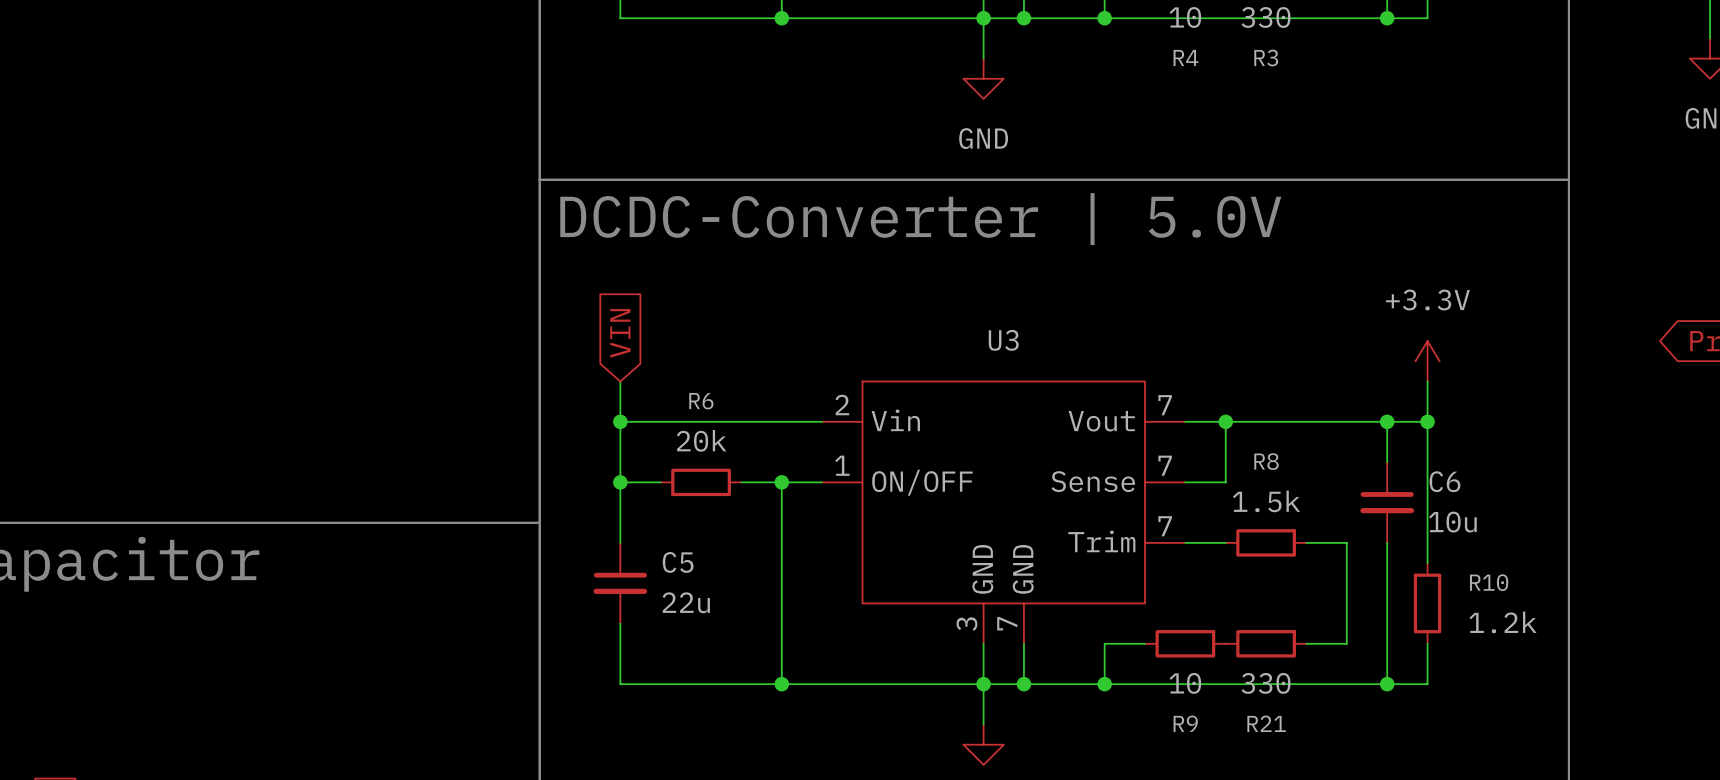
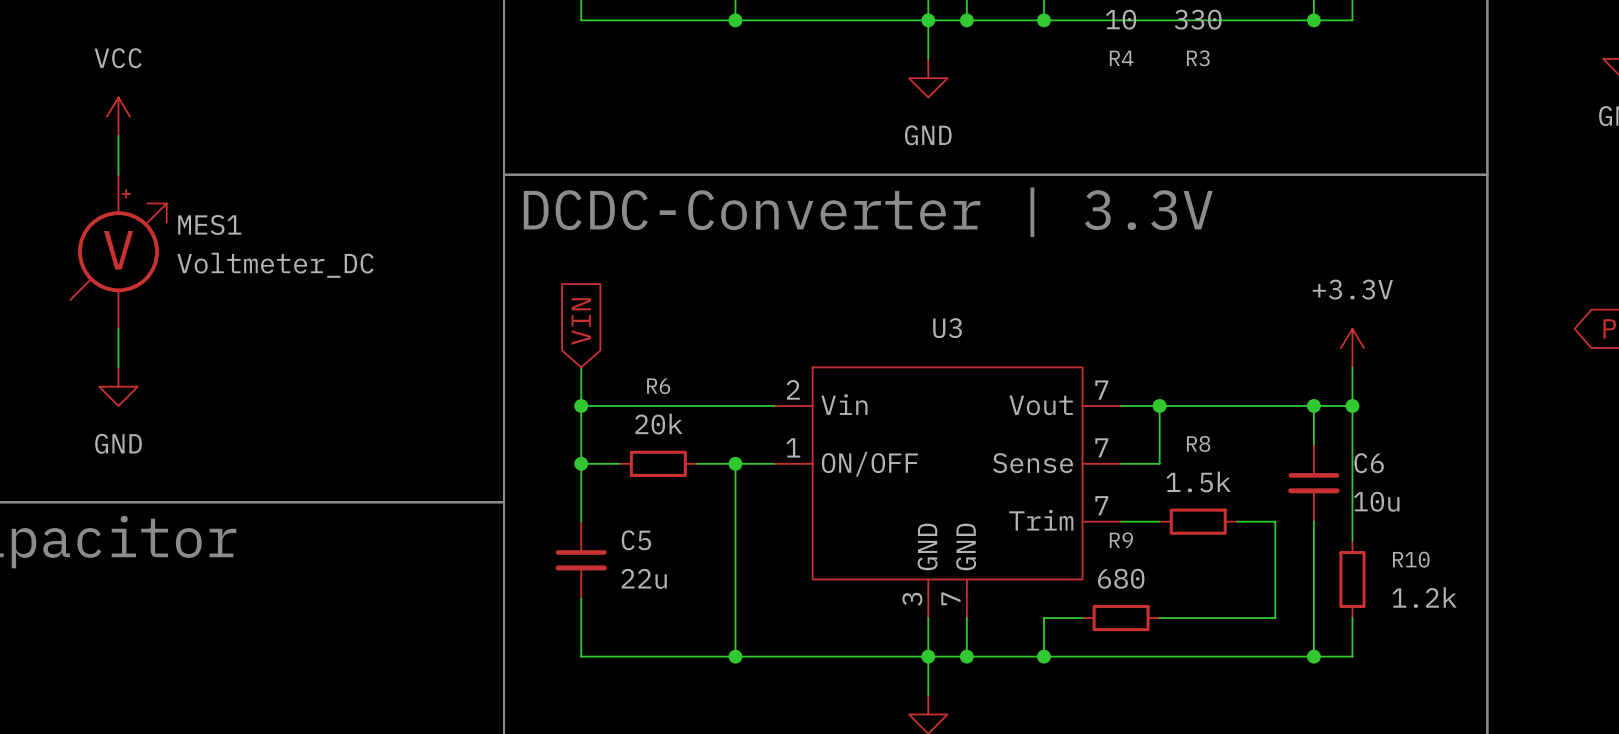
power symbol: none -> VCC (118, 116)
wire: none -> (118, 136) (118, 174)
text: DCDC-Converter | 5.0V (920, 219) -> DCDC-Converter | 3.3V (868, 212)
MES1: none -> Voltmeter_DC (118, 251)
wire: none -> (118, 328) (118, 367)
power symbol: none -> GND (118, 386)
wire: none -> (1159, 618) (1236, 618)
R21: 330 (1266, 643) -> none
R9 value: 10 (1185, 683) -> 680 (1121, 578)
R9 name position: R9 (1185, 723) -> R9 (1121, 540)

